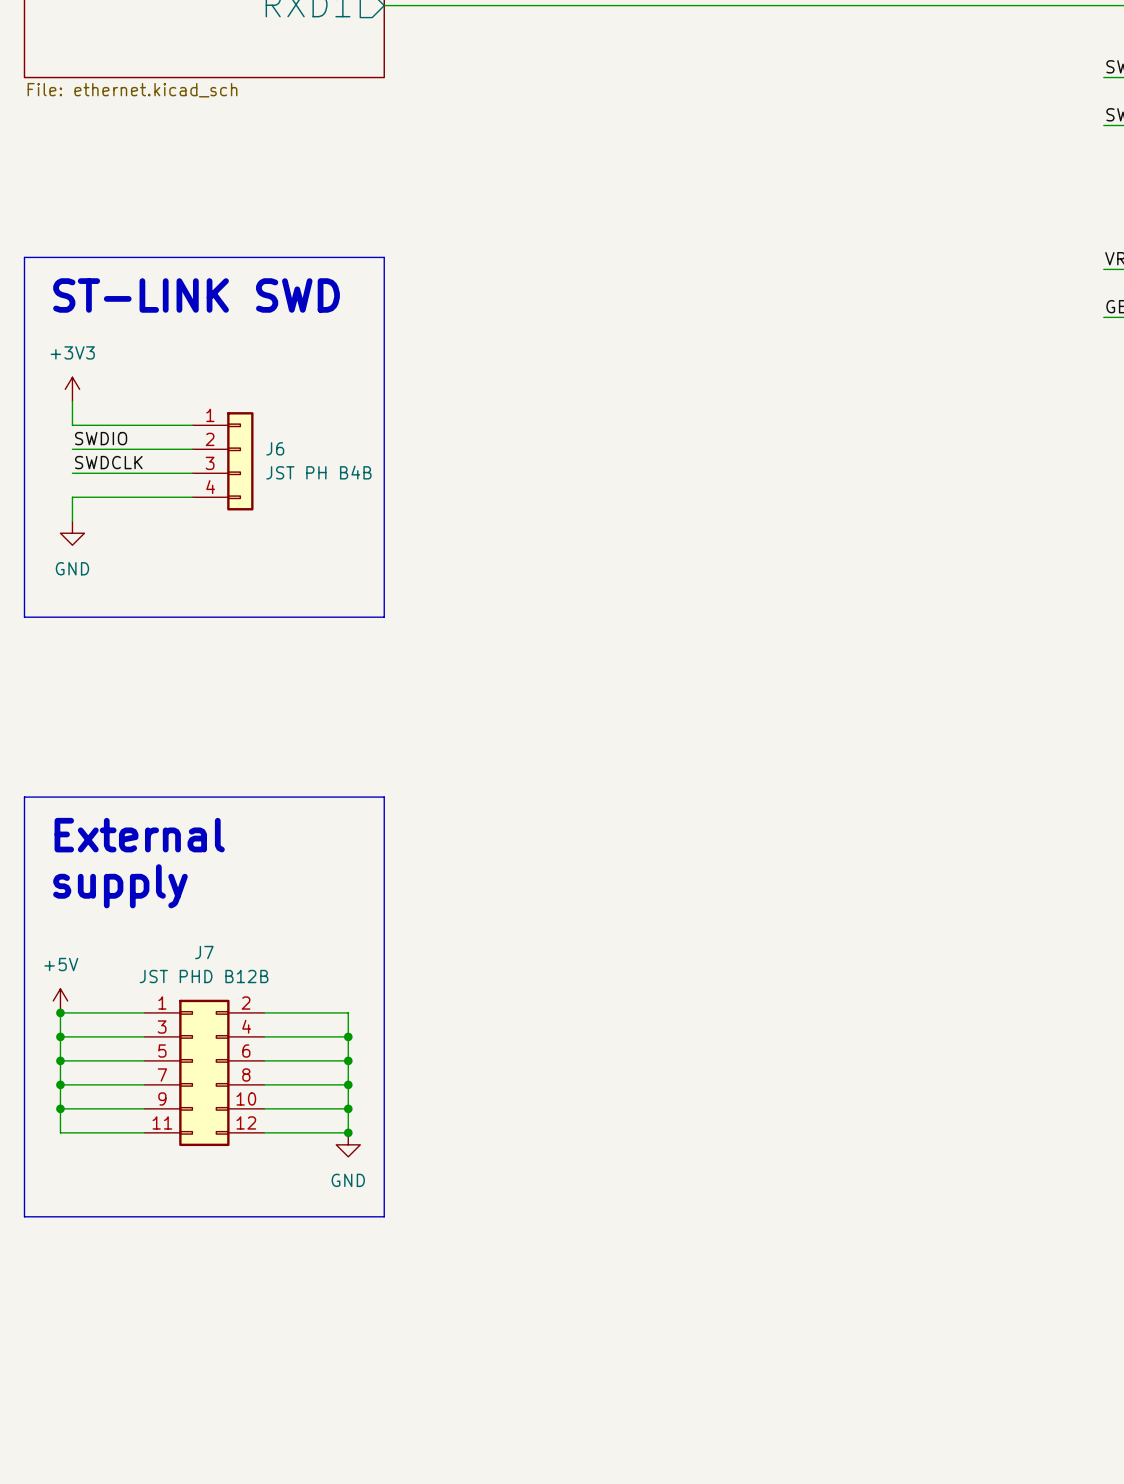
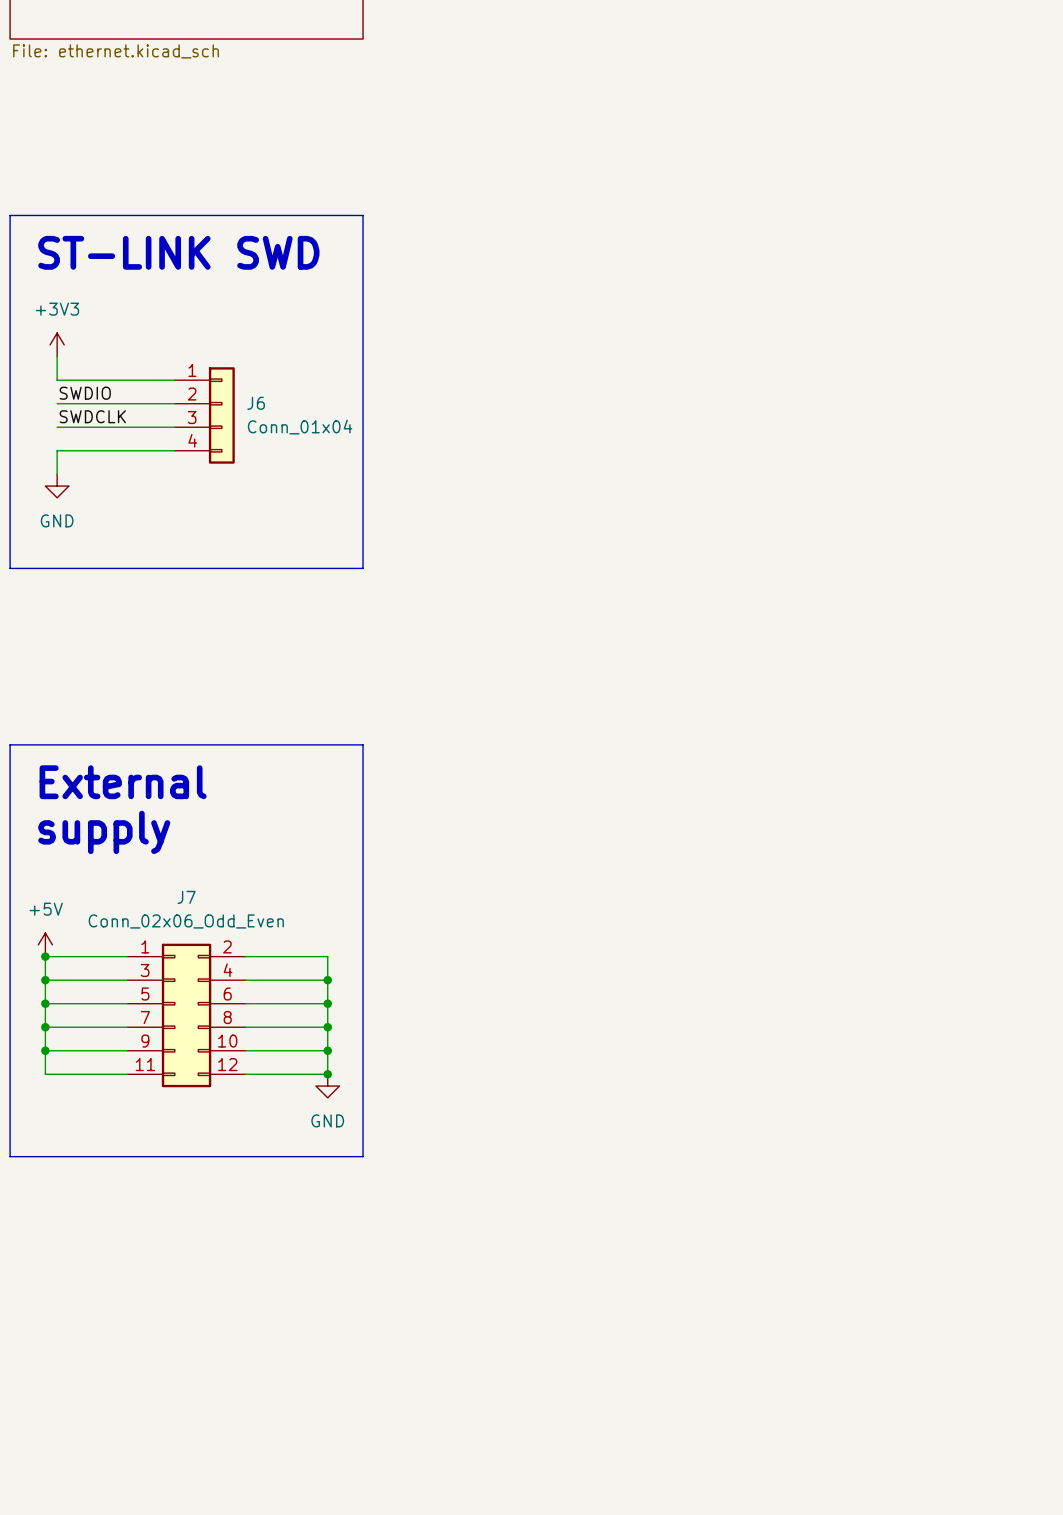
J6 value: JST PH B4B (318, 472) -> Conn_01x04 (300, 427)
J7 value: JST PHD B12B (204, 976) -> Conn_02x06_Odd_Even (186, 921)

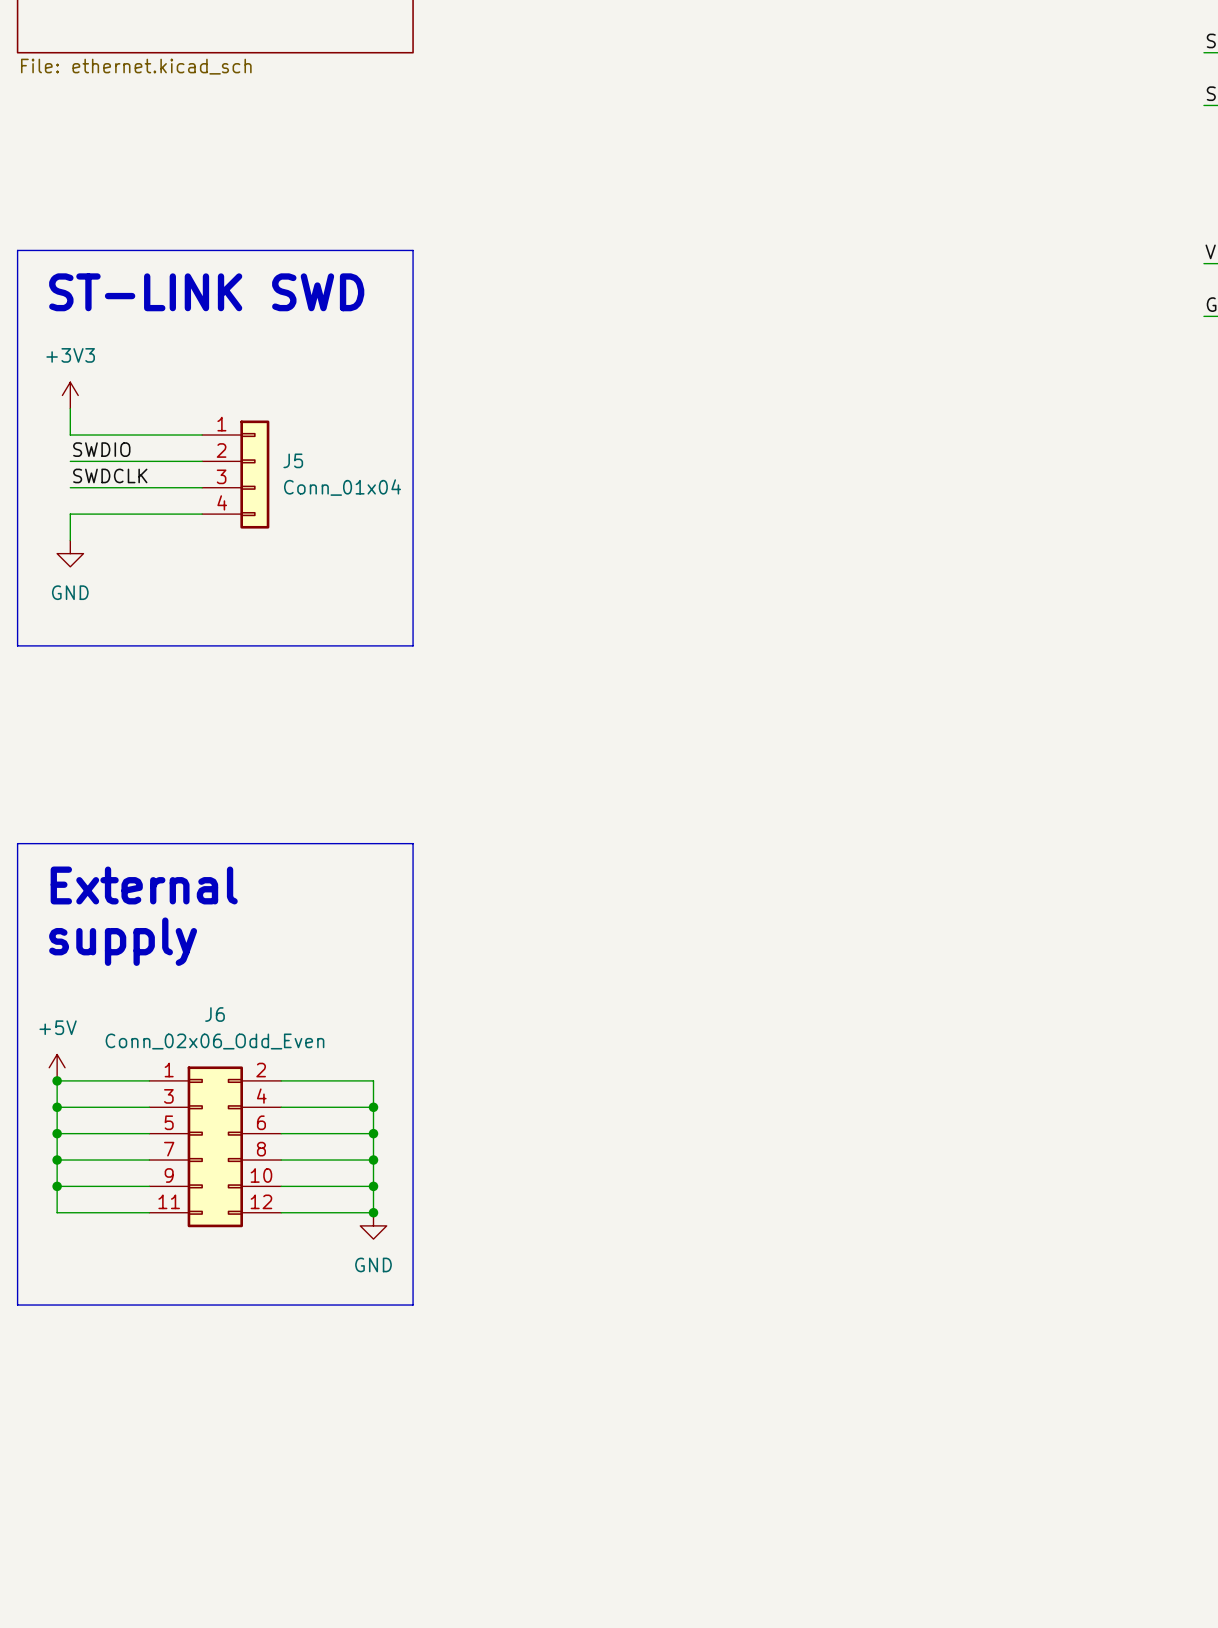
J6 name: J6 (256, 403) -> J5 (293, 460)
J7 name: J7 (186, 897) -> J6 (215, 1014)

